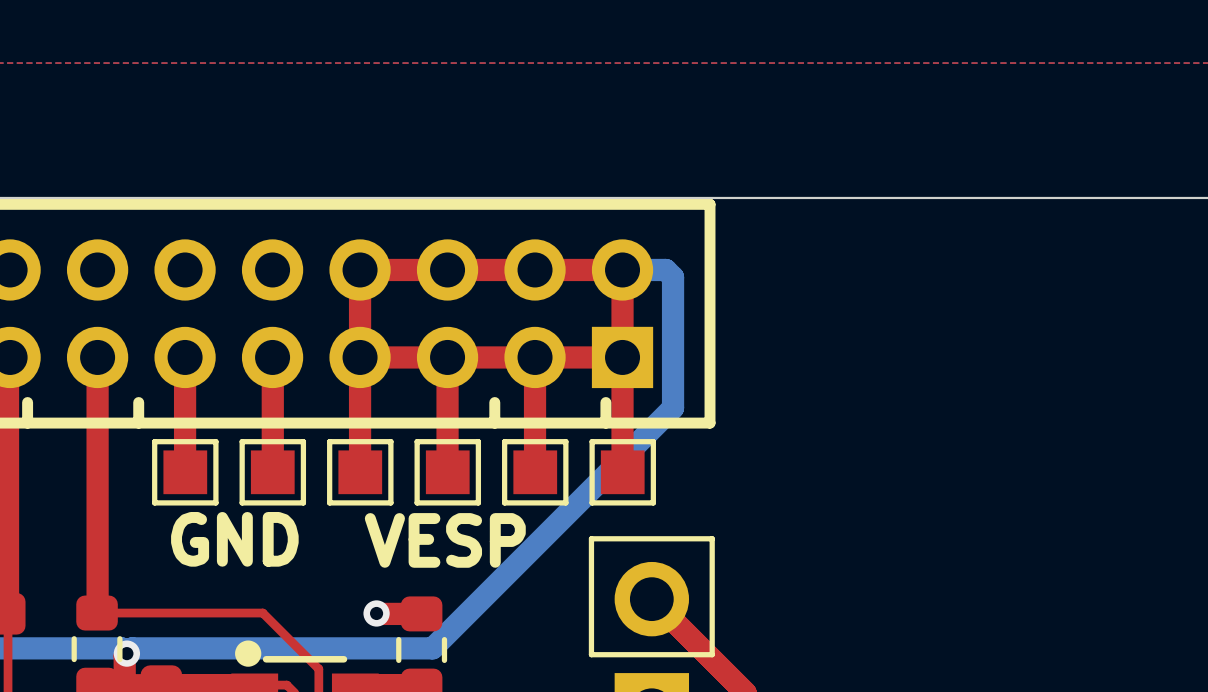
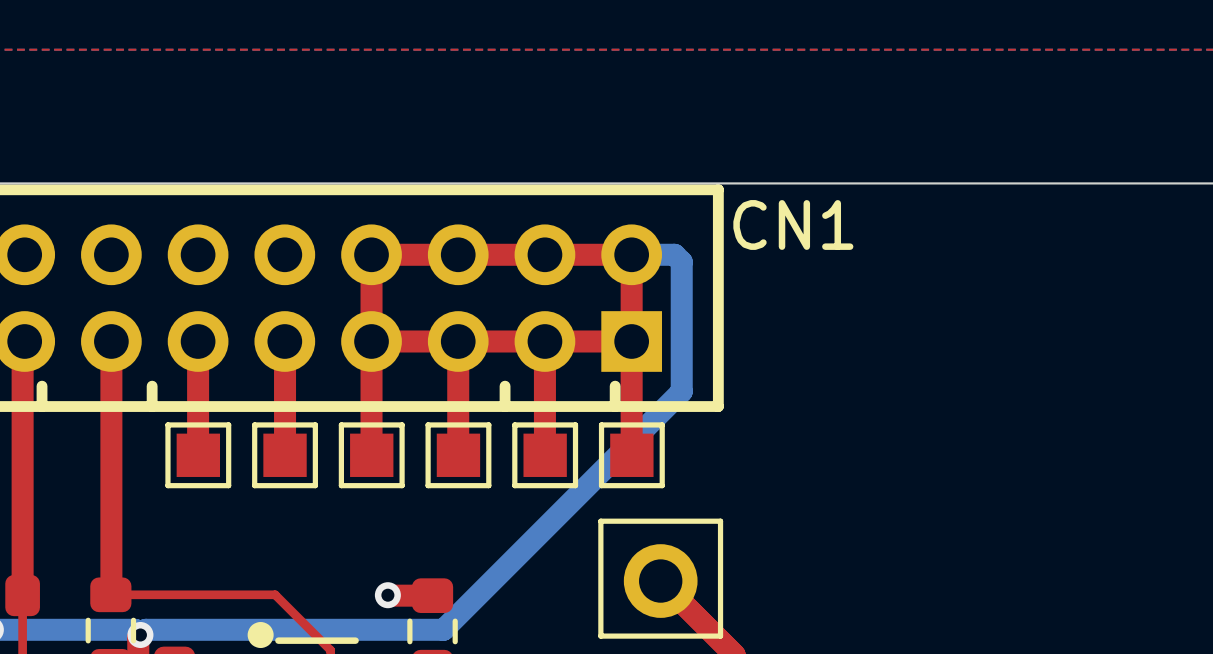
CN1 name: none -> CN1 (793, 224)
text: GND (234, 539) -> none
text: VESP (445, 540) -> none

